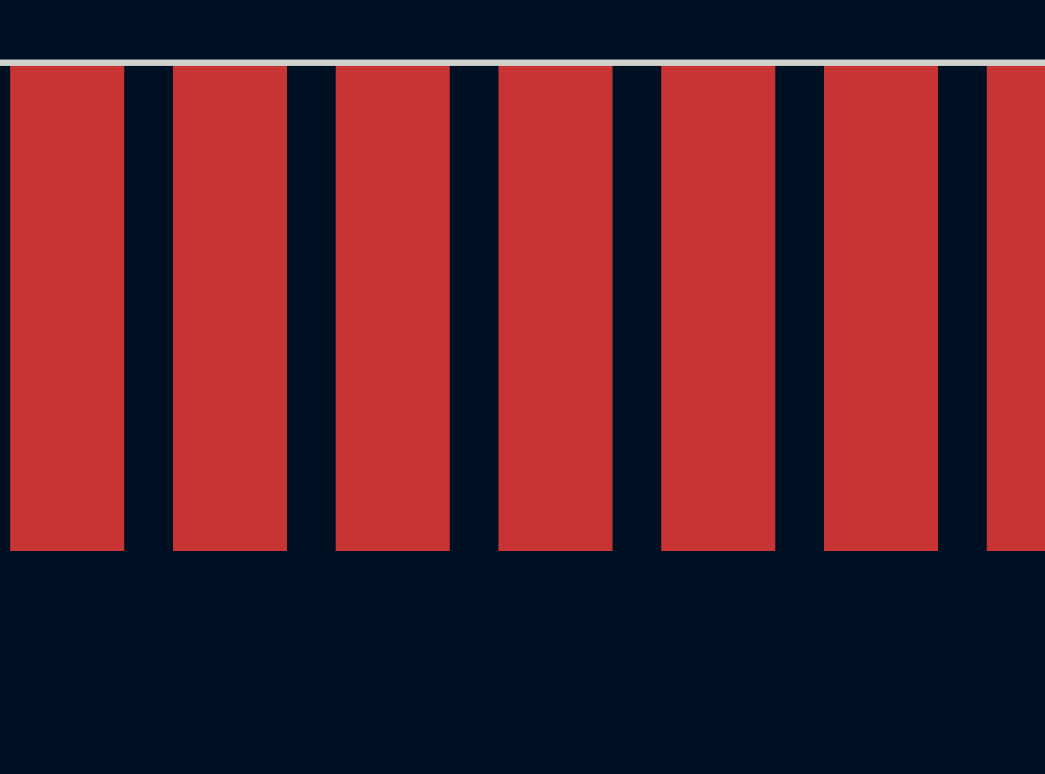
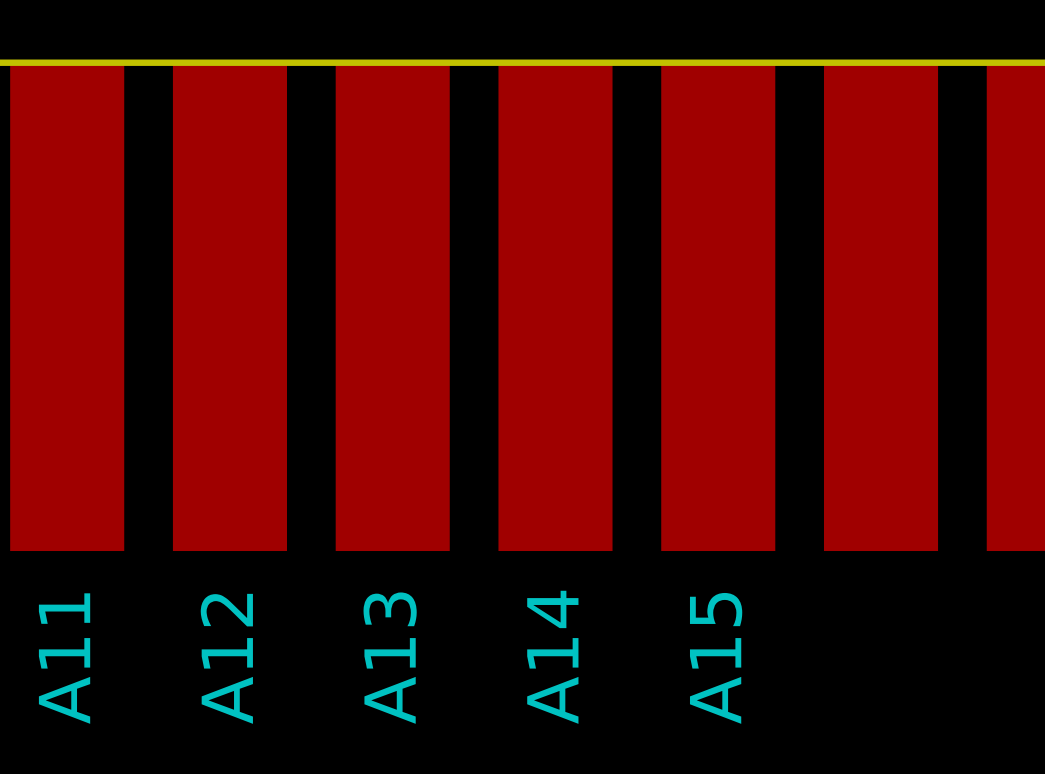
text: none -> A14 (552, 657)
text: none -> A11 (64, 658)
text: none -> A12 (226, 658)
text: none -> A13 (390, 658)
text: none -> A15 (716, 658)

